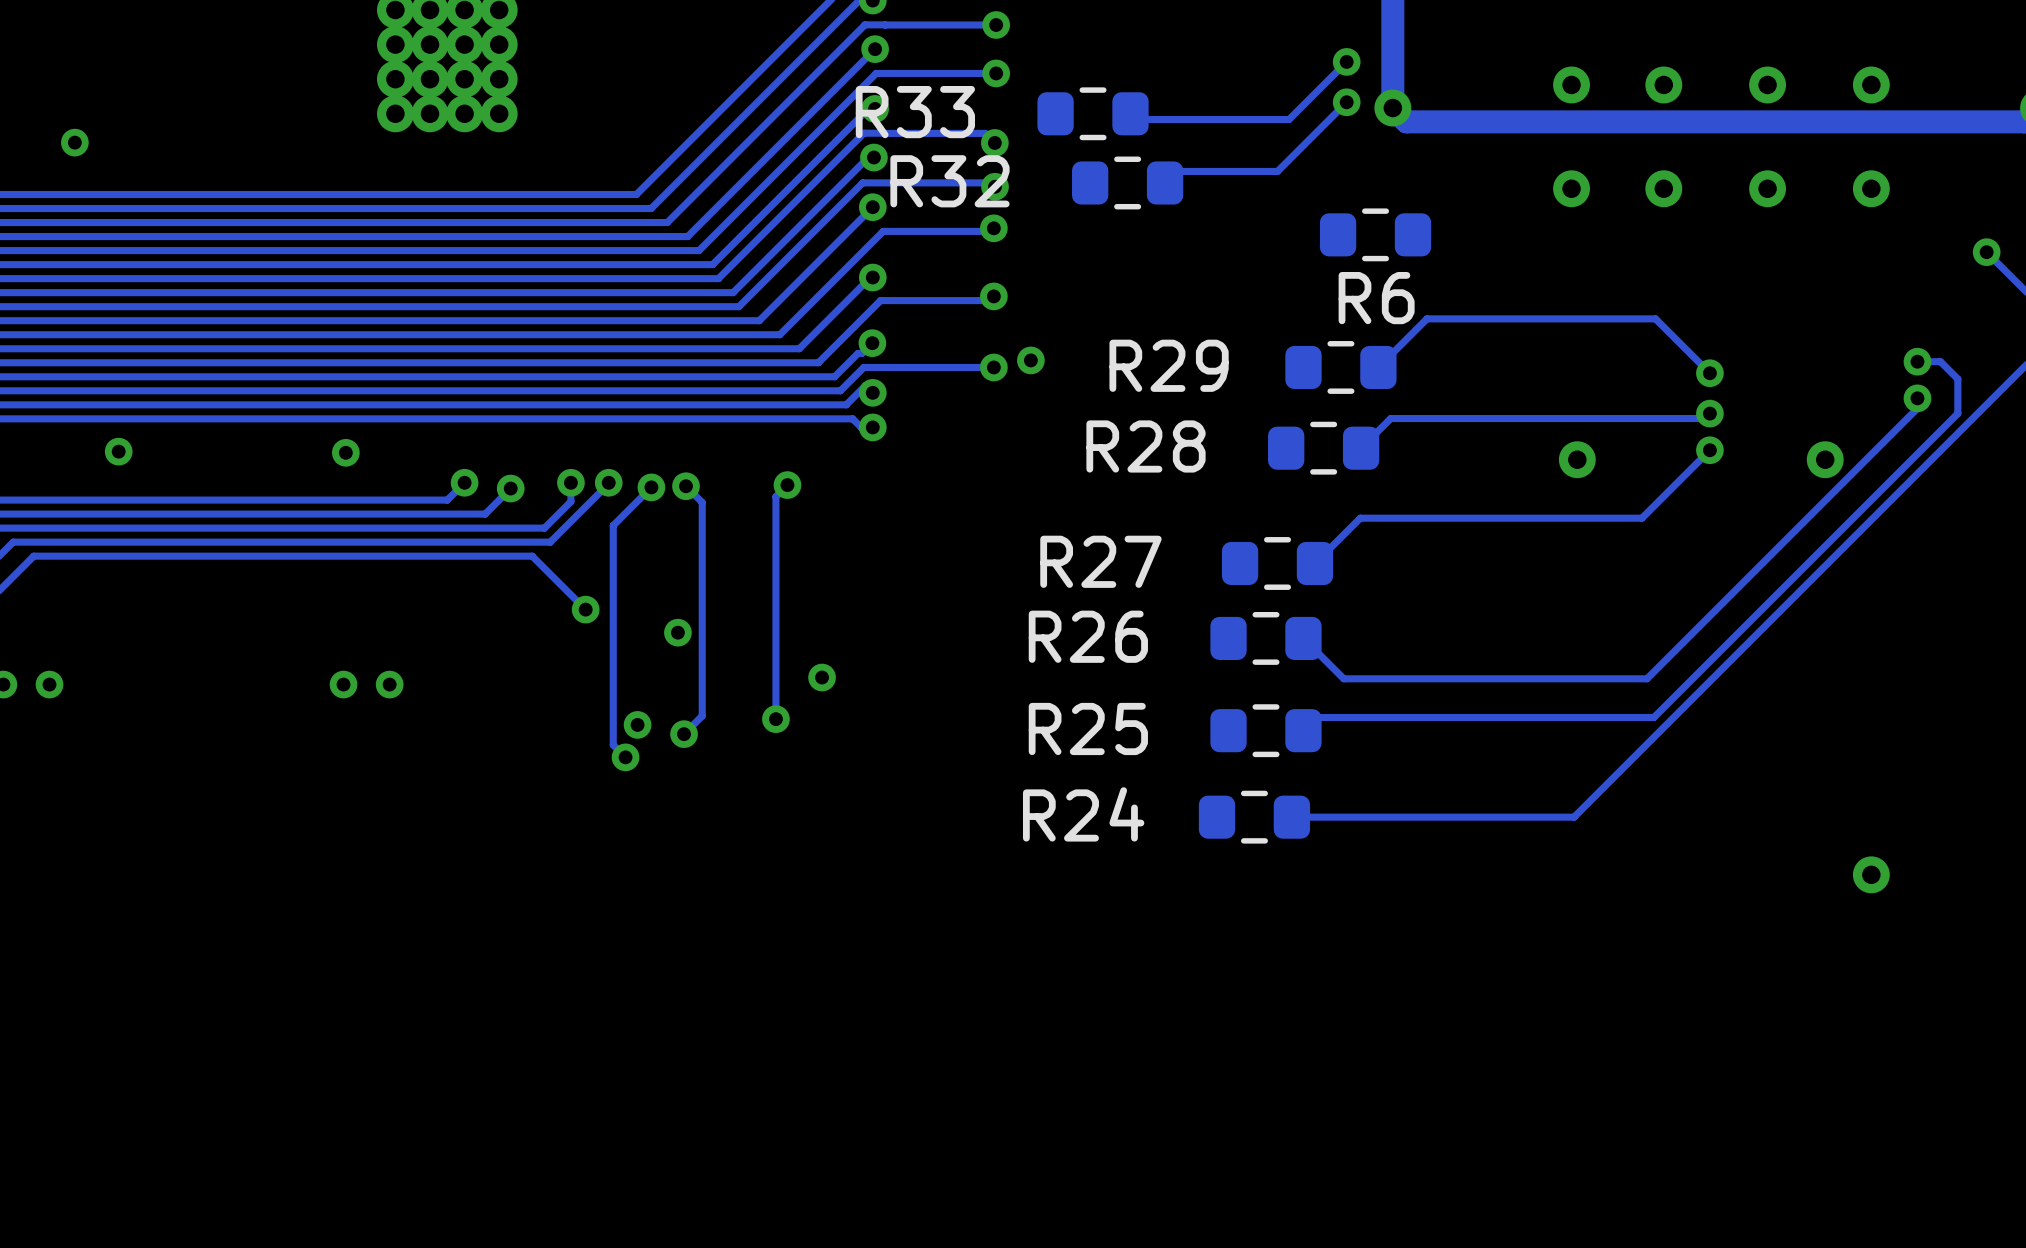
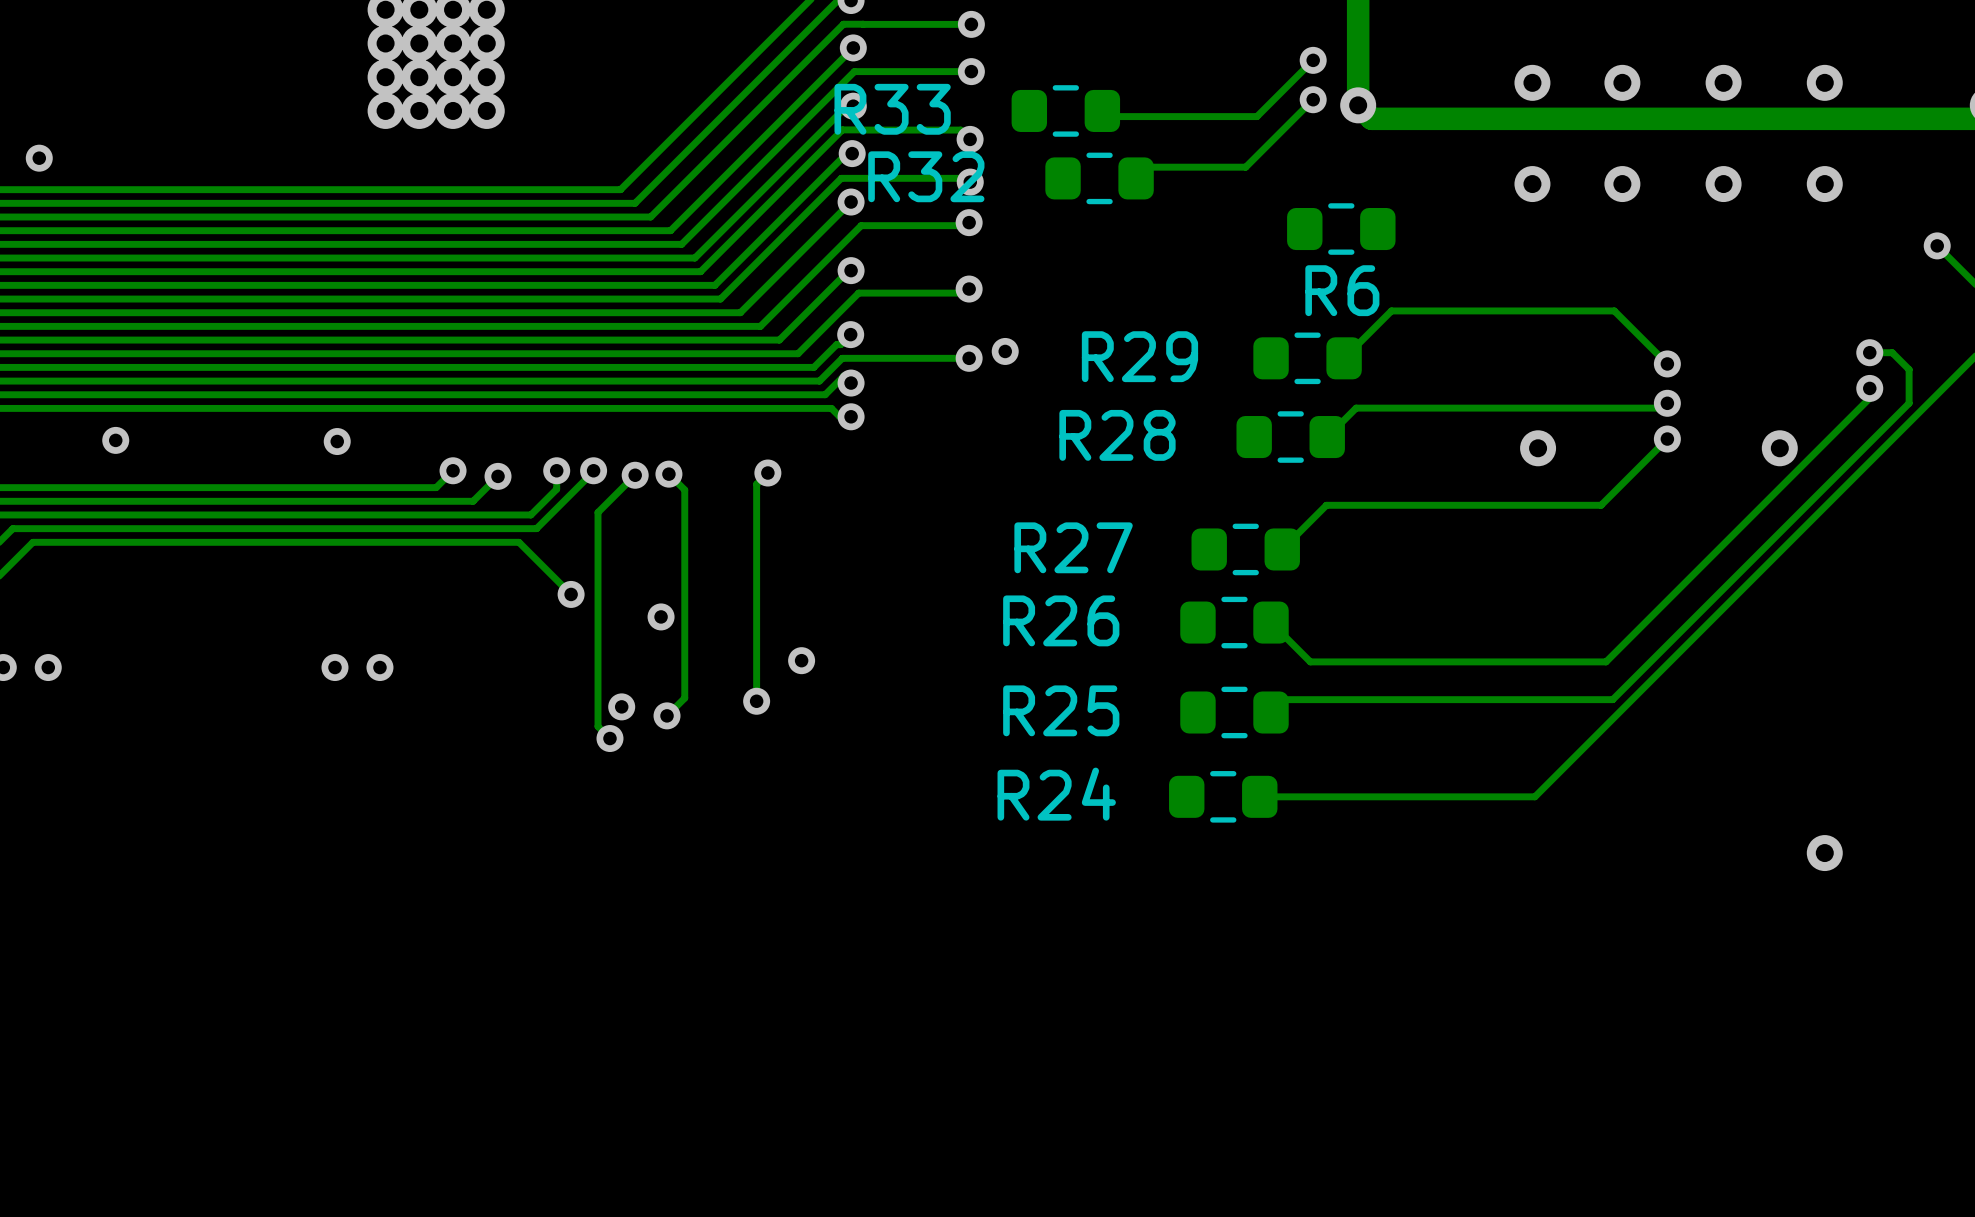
via position: (74, 142) -> (39, 158)

